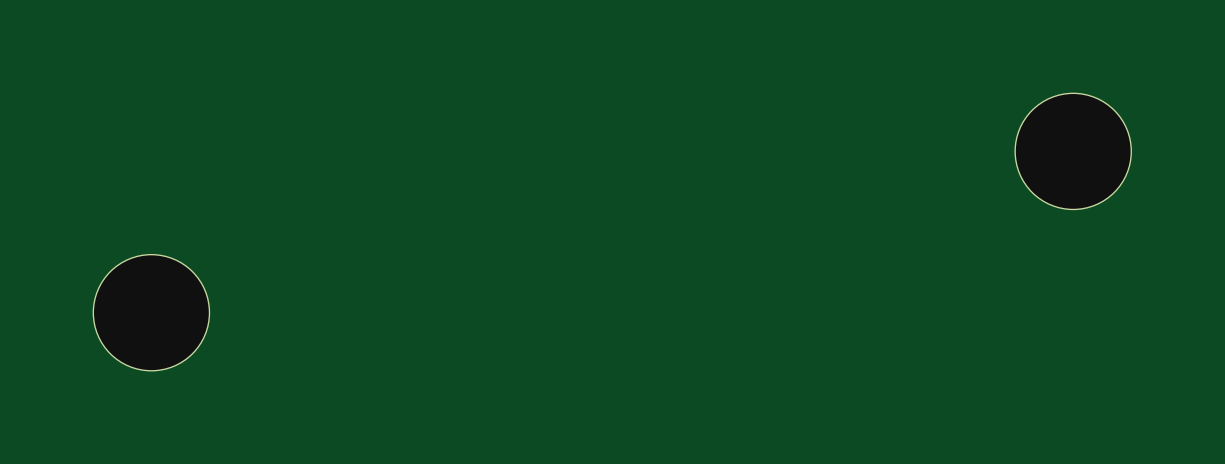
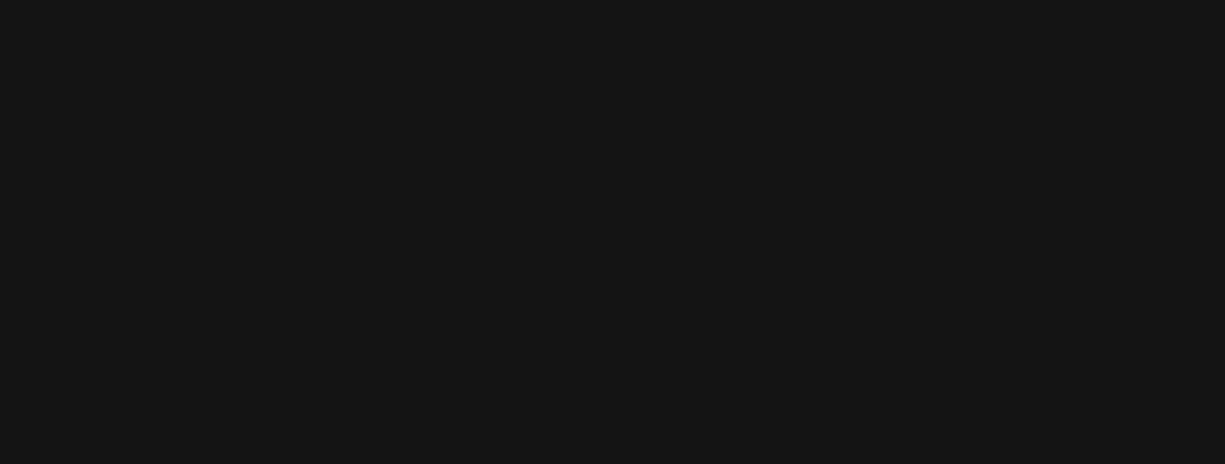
part: (1073, 151) -> none
part: (151, 312) -> none

